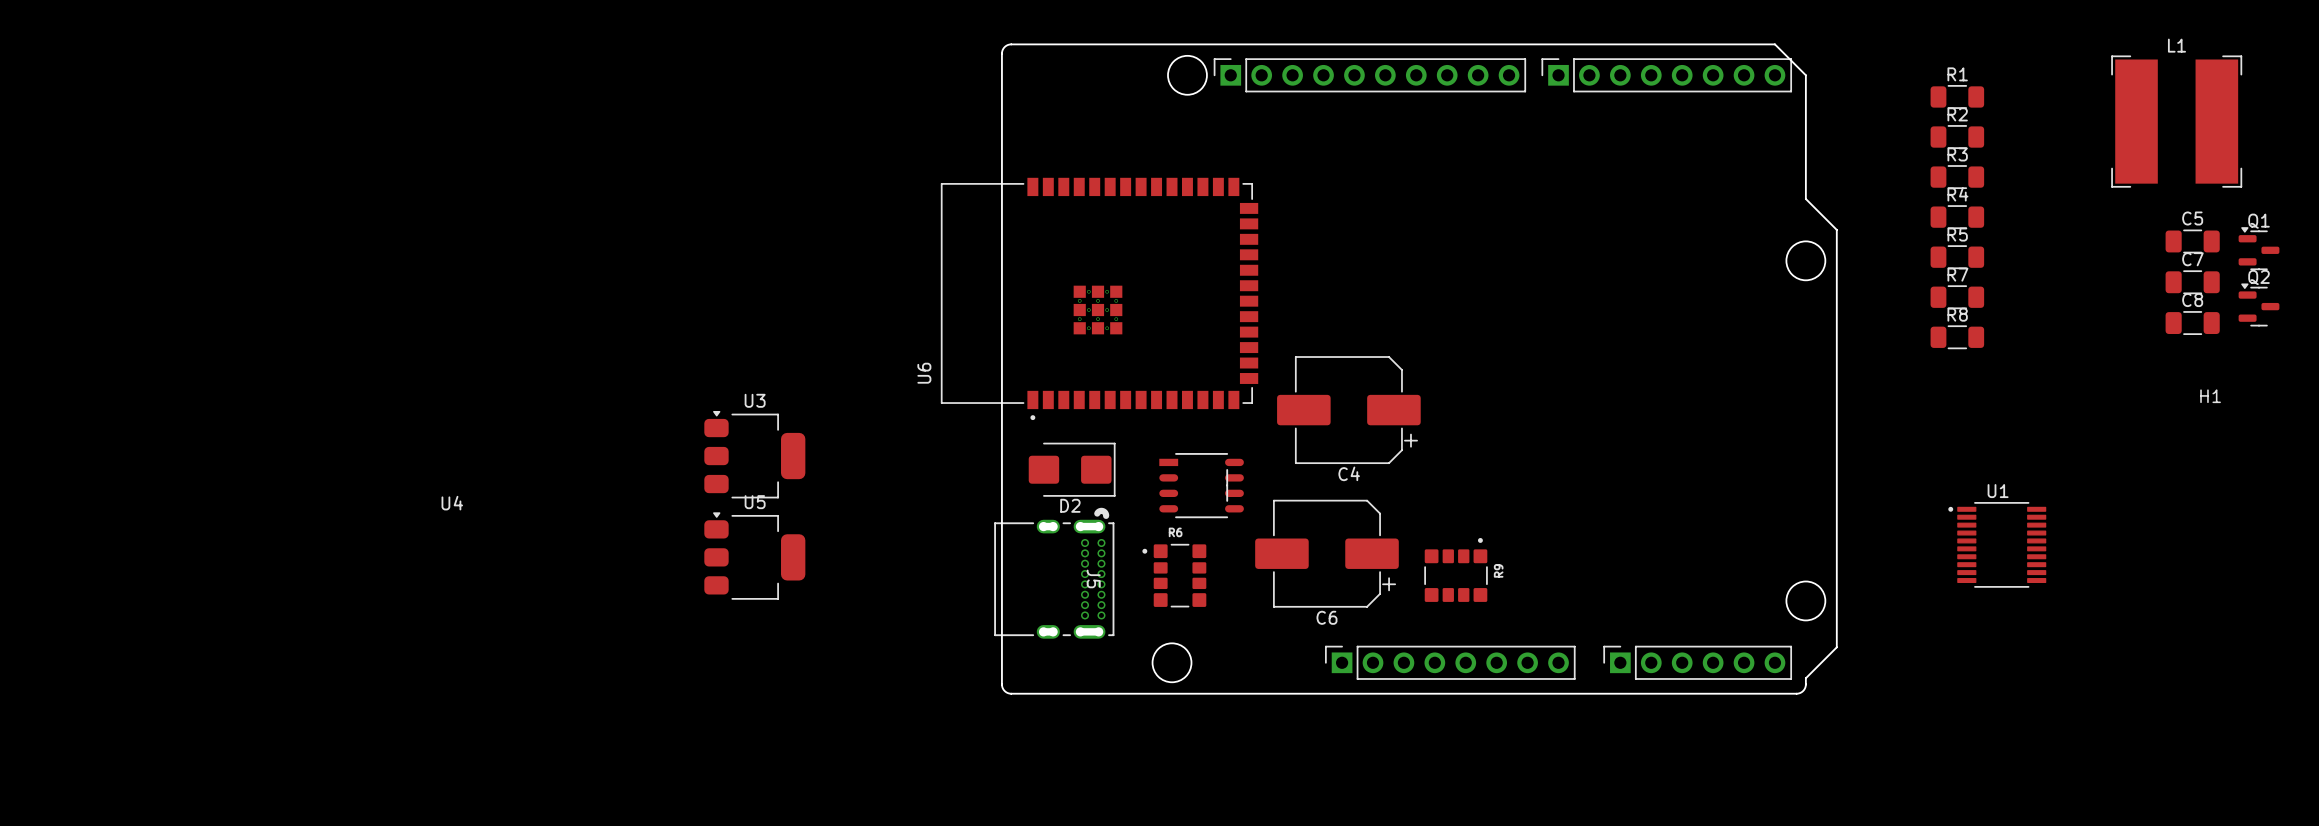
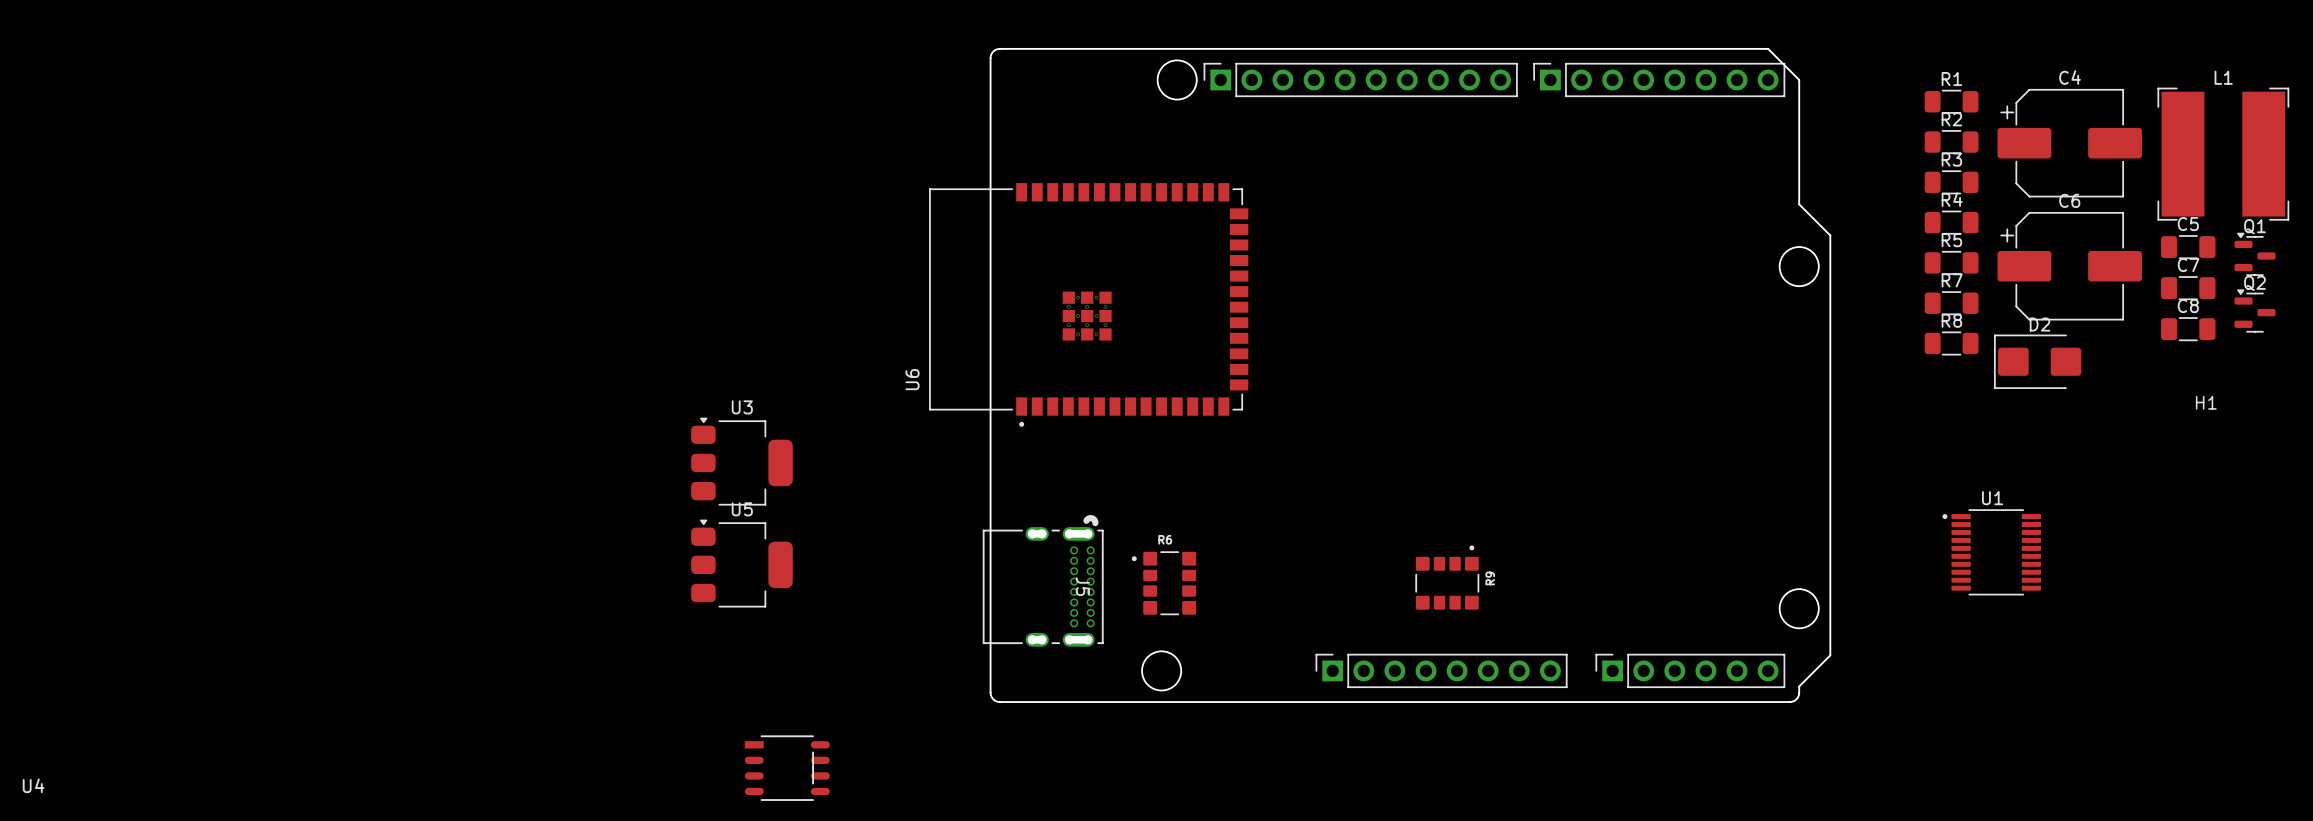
L1 position: (2176, 121) -> (2223, 154)
C4 rotation: 0° (1348, 410) -> 180° (2069, 143)
C4 position: (1348, 410) -> (2069, 143)
D2 rotation: 0° (1072, 469) -> 180° (2037, 361)
D2 position: (1072, 469) -> (2037, 361)
U4 position: (1201, 485) -> (787, 768)
C6 rotation: 0° (1326, 553) -> 180° (2069, 266)
C6 position: (1326, 553) -> (2069, 266)

